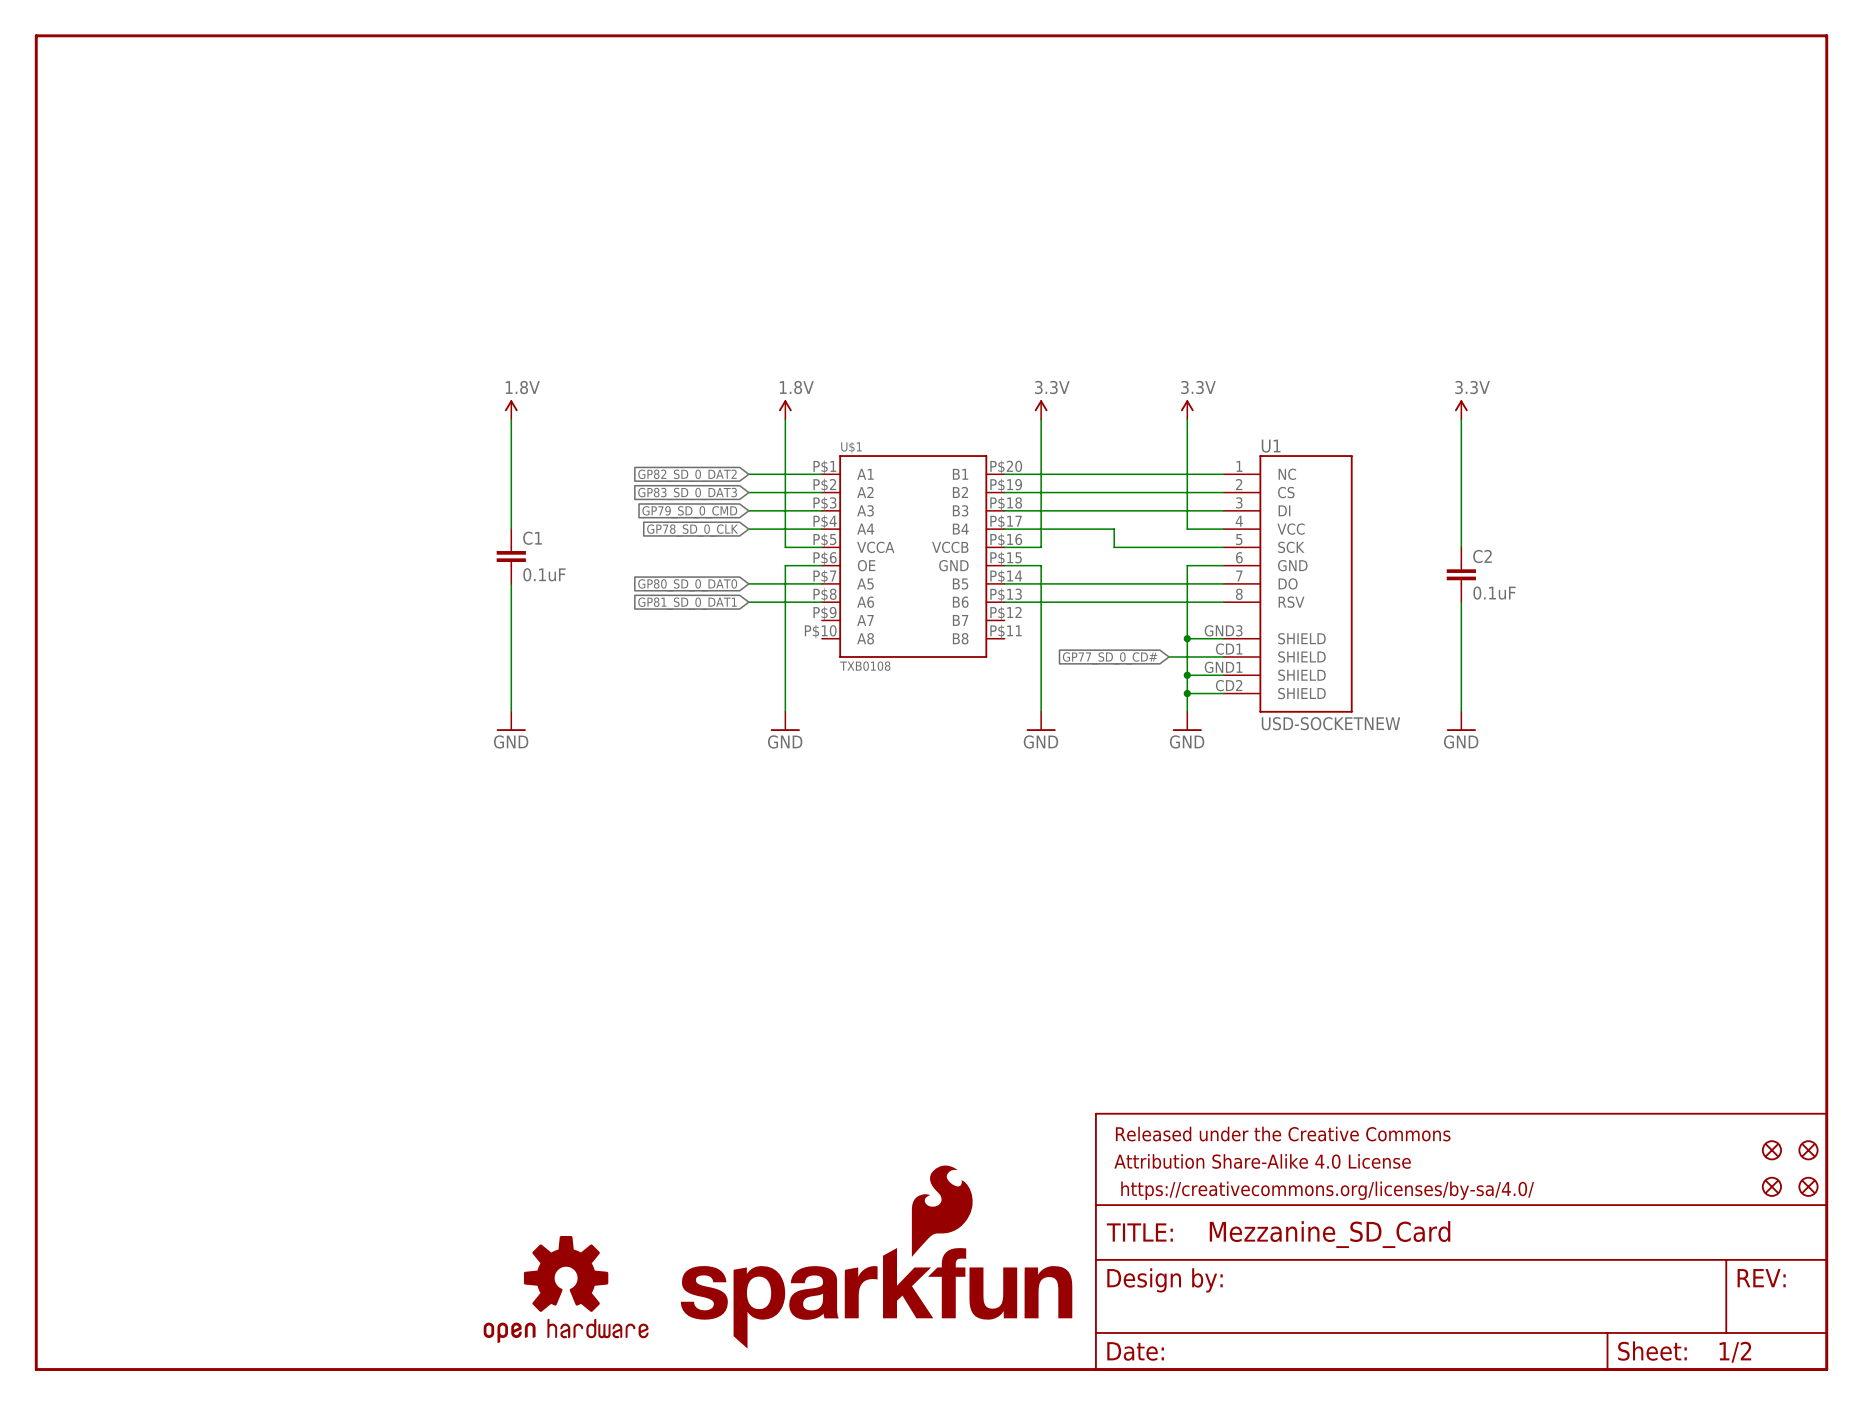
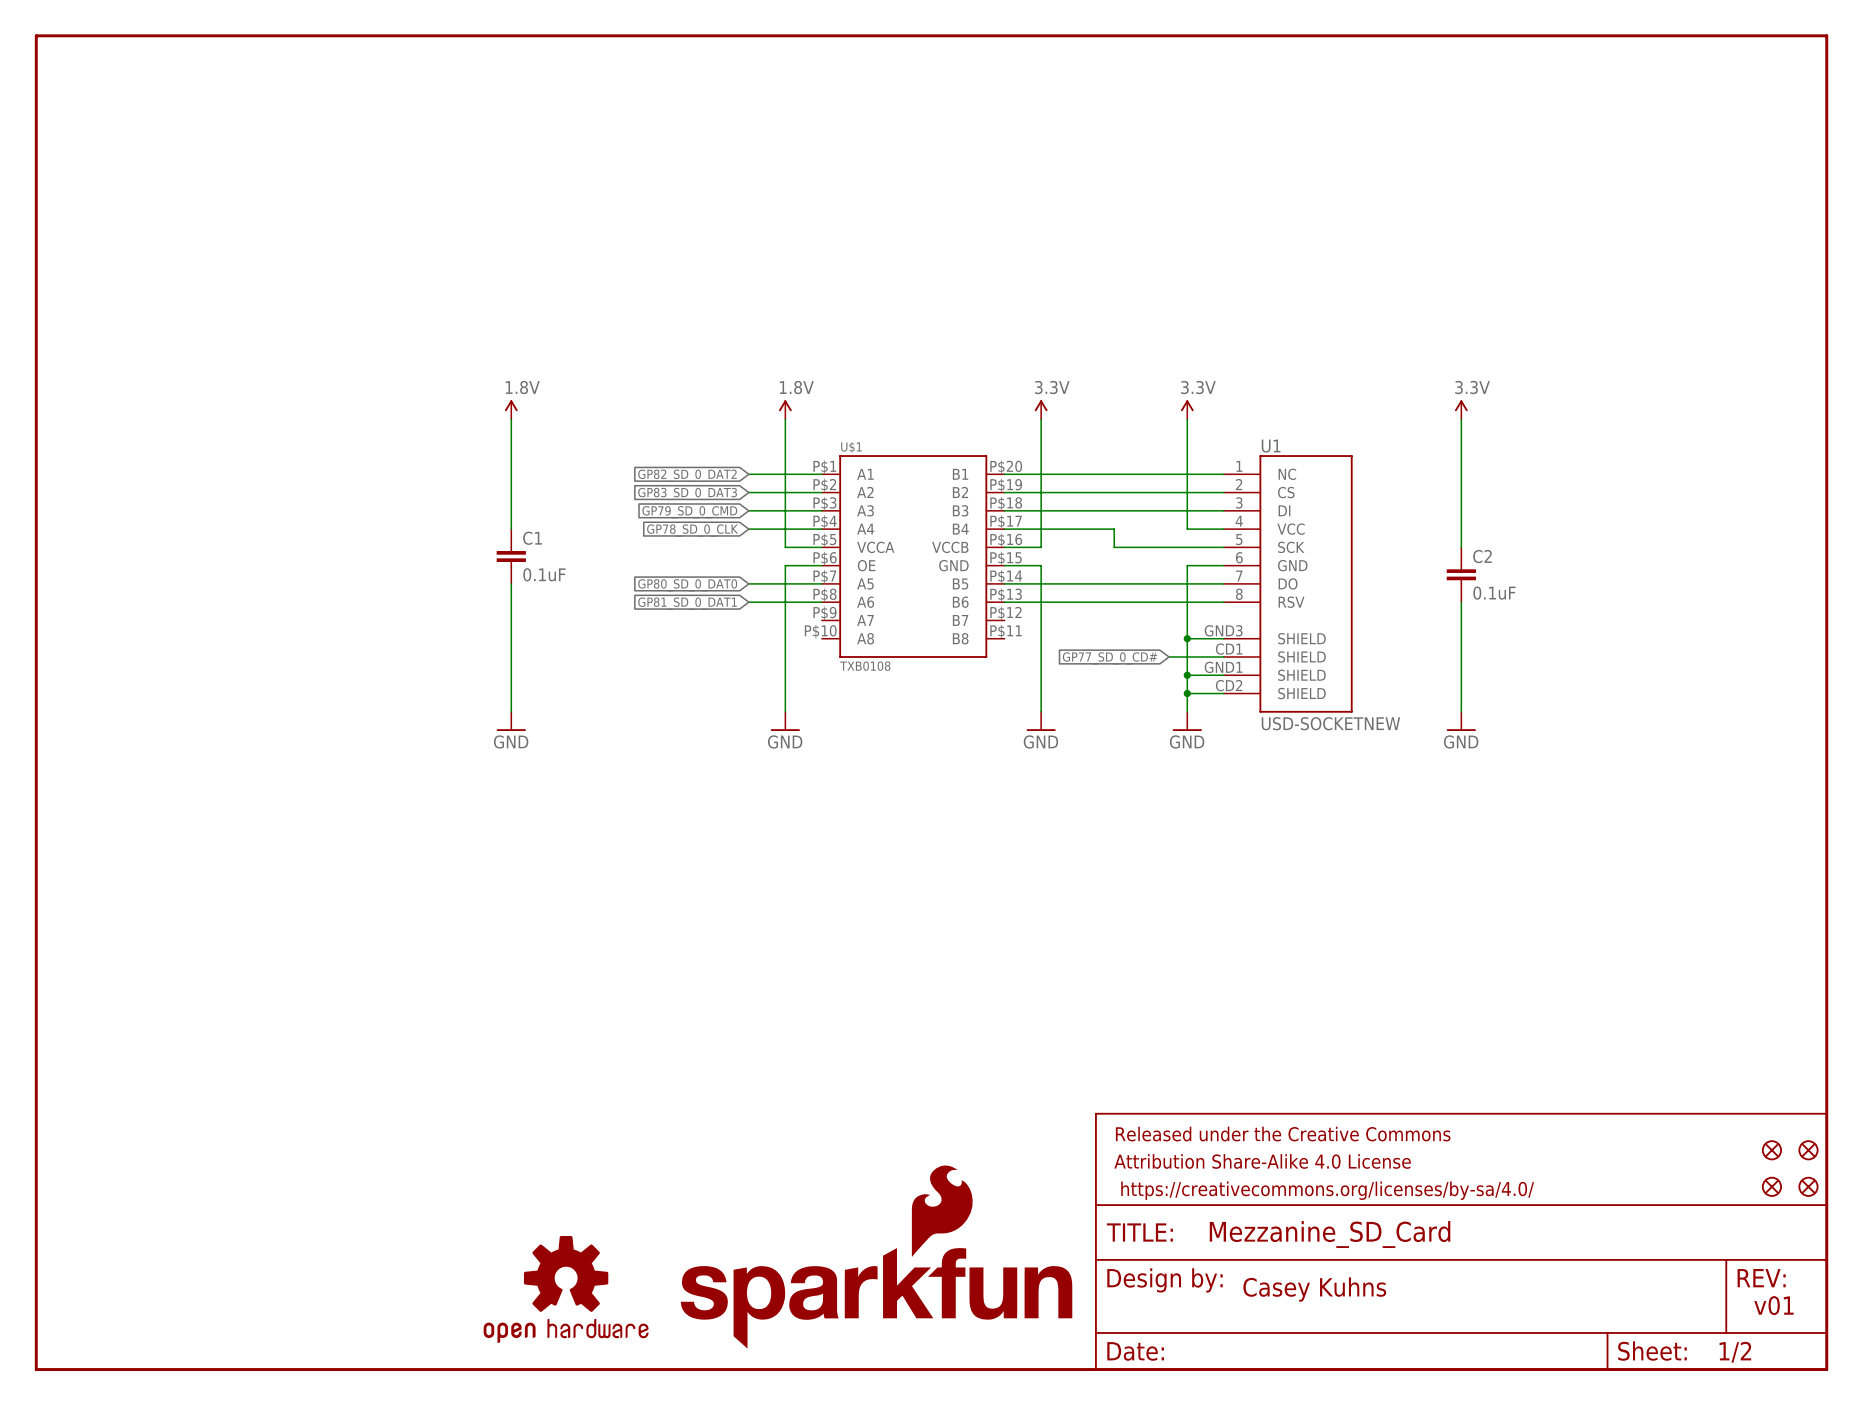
text: none -> Casey Kuhns (1314, 1289)
text: none -> v01 (1773, 1305)

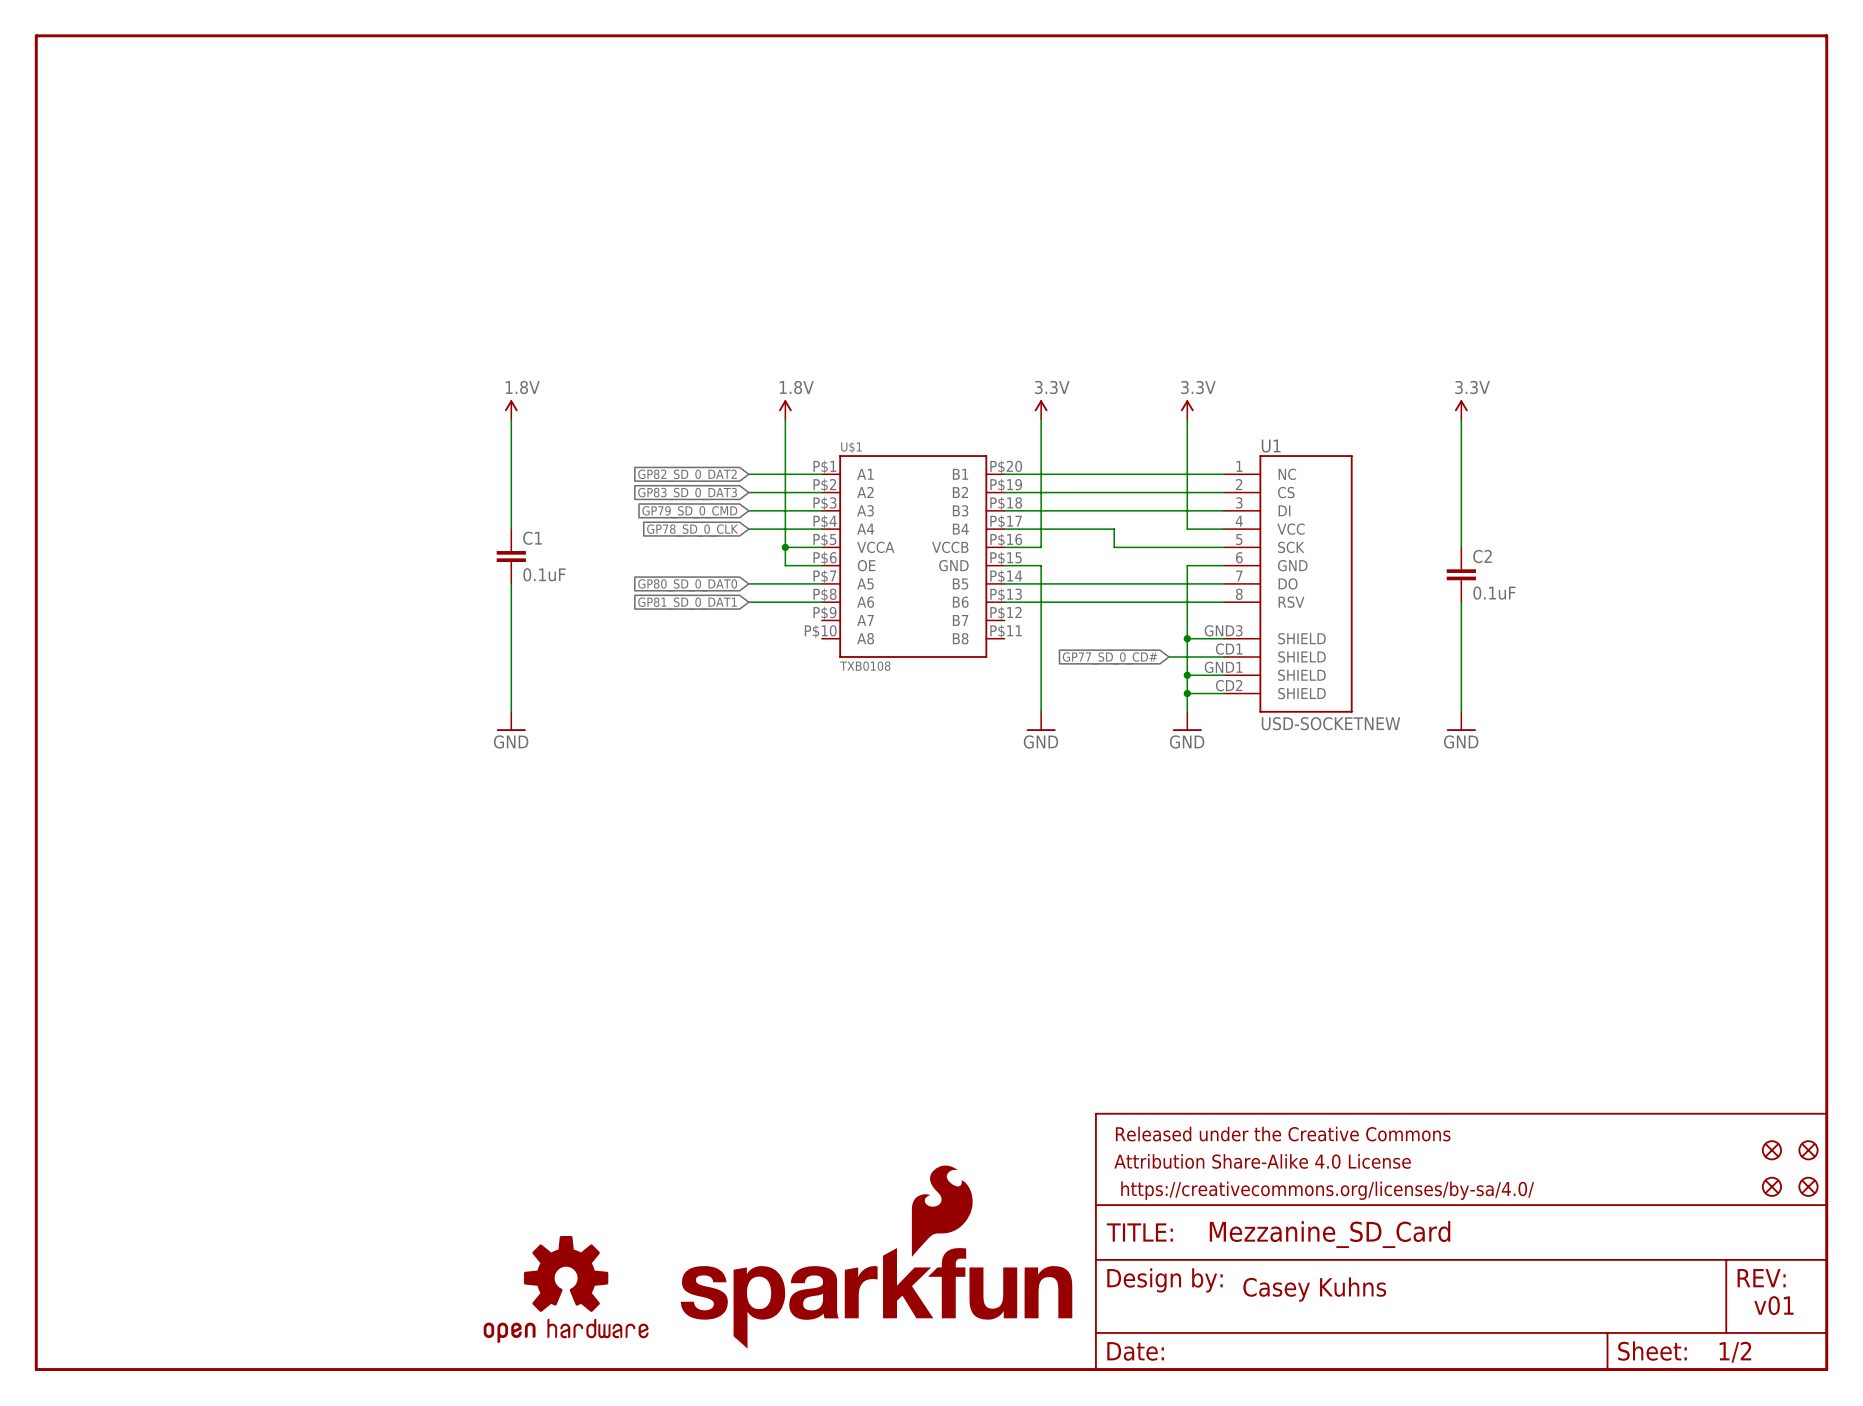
junction: none -> (785, 547)
wire: (785, 565) (785, 711) -> (785, 565) (785, 547)
power symbol: GND (785, 721) -> none

